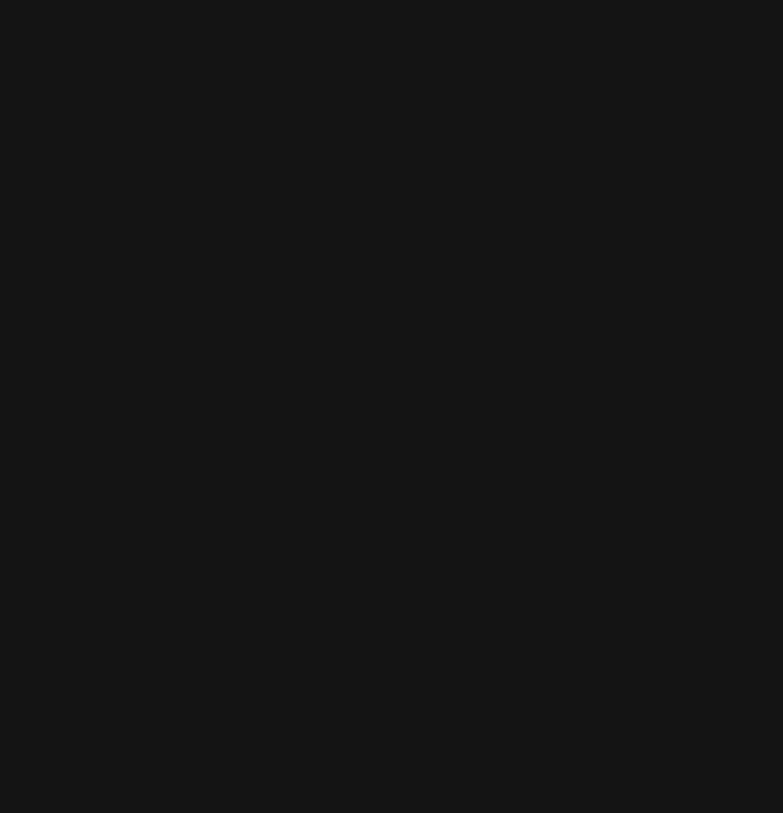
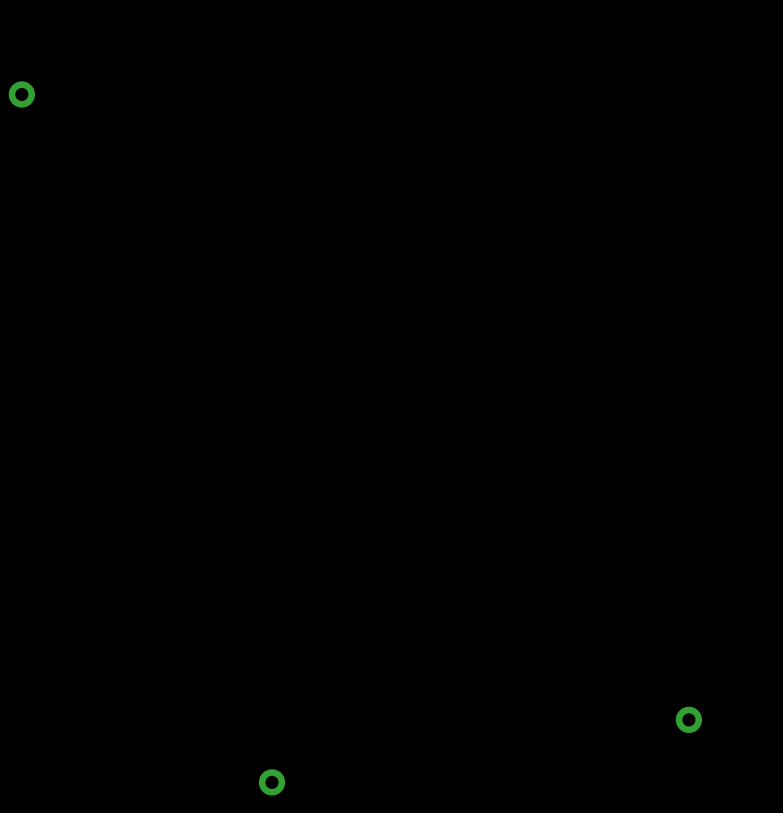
via: none -> (21, 94)
via: none -> (688, 719)
via: none -> (271, 782)

